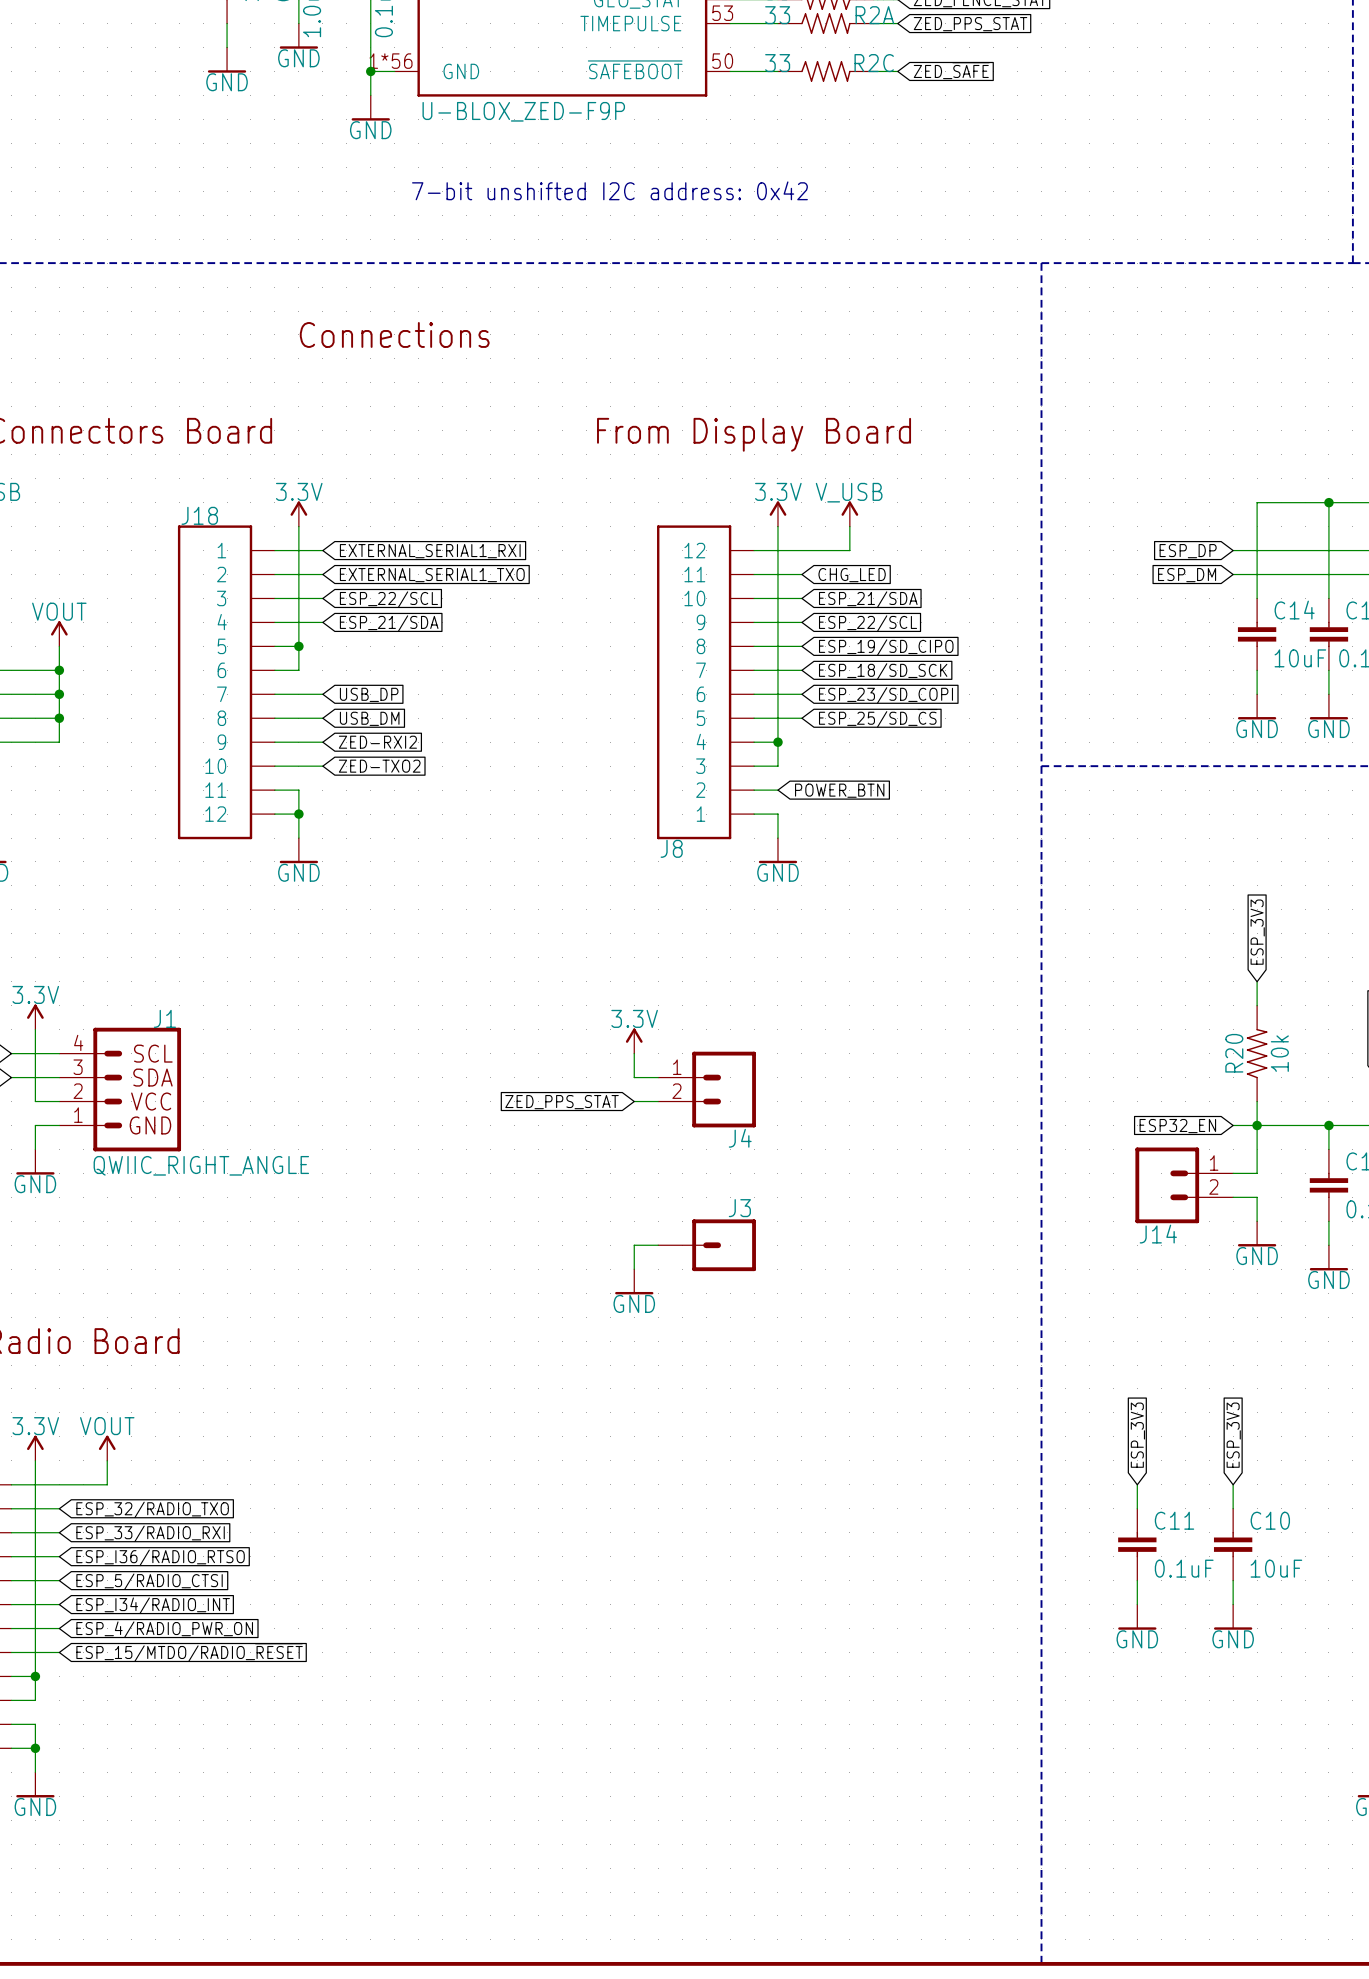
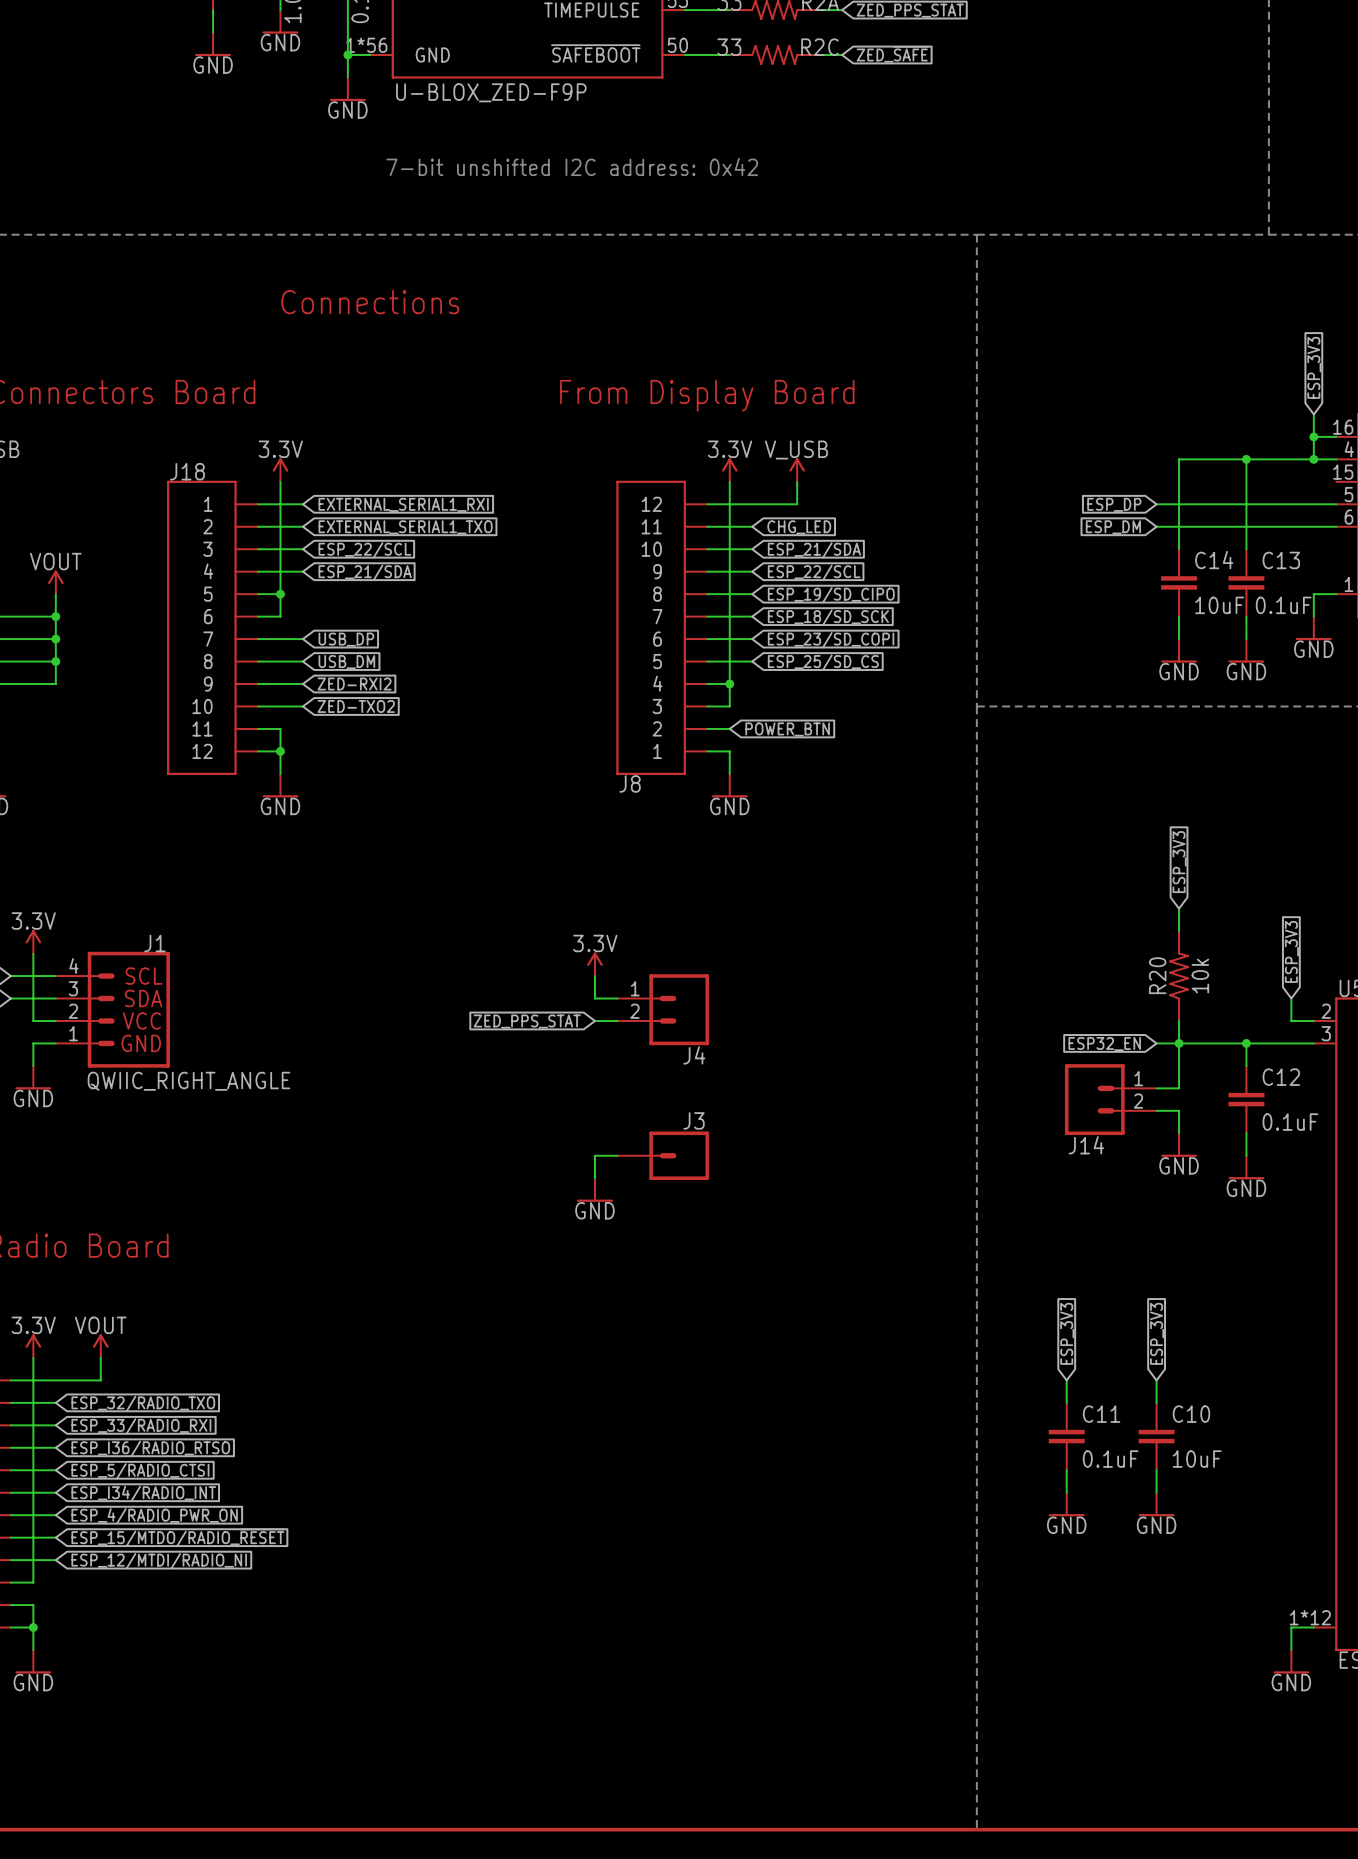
wire: none -> (33, 1560) (55, 1560)
junction: (35, 1676) -> none
global label: none -> ESP_12/MTDI/RADIO_NI (159, 1561)

